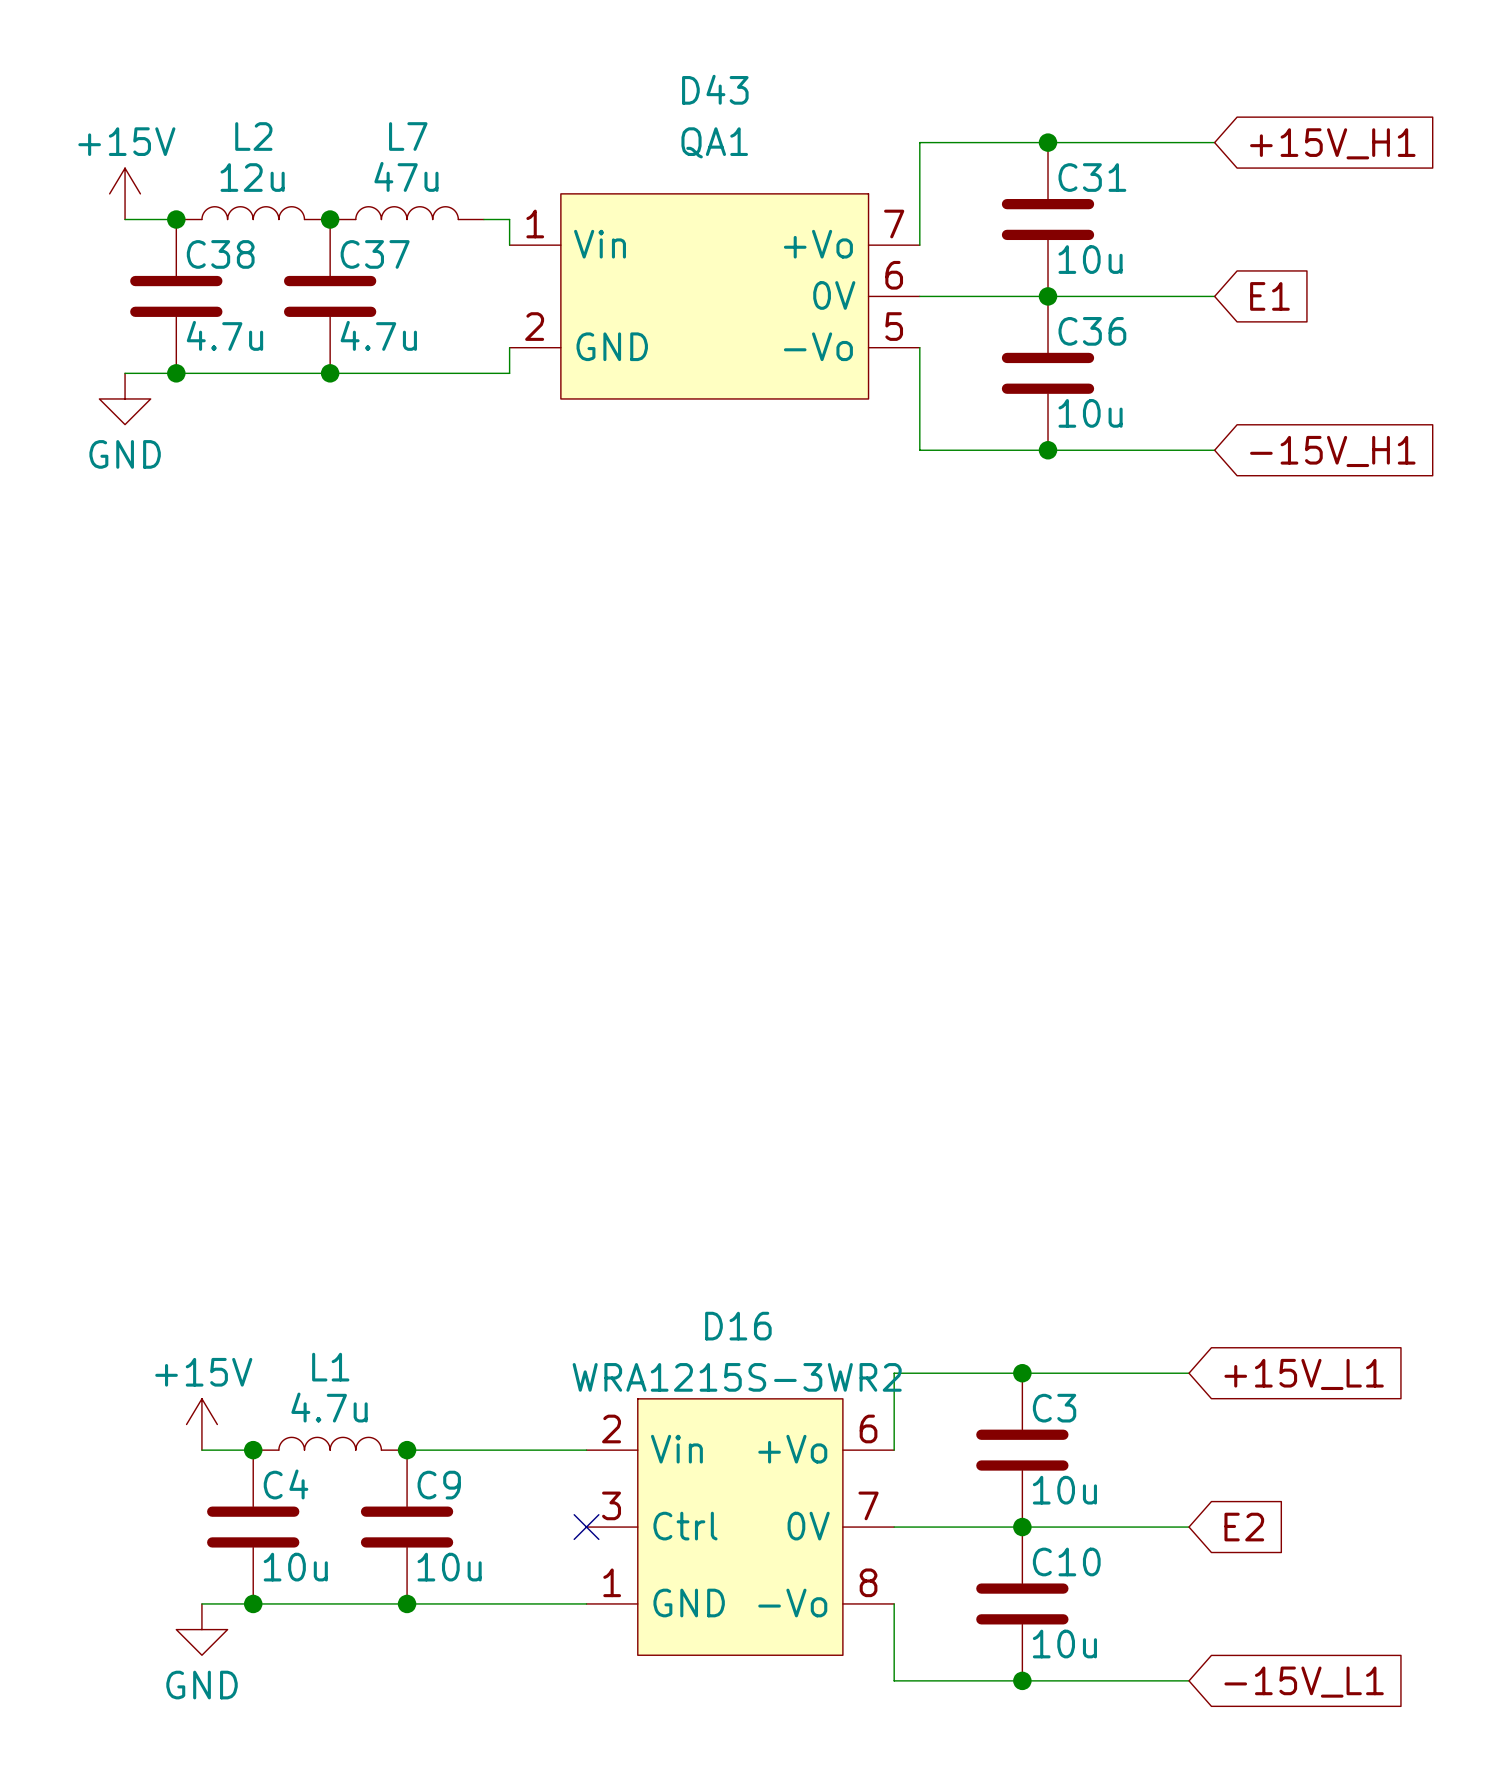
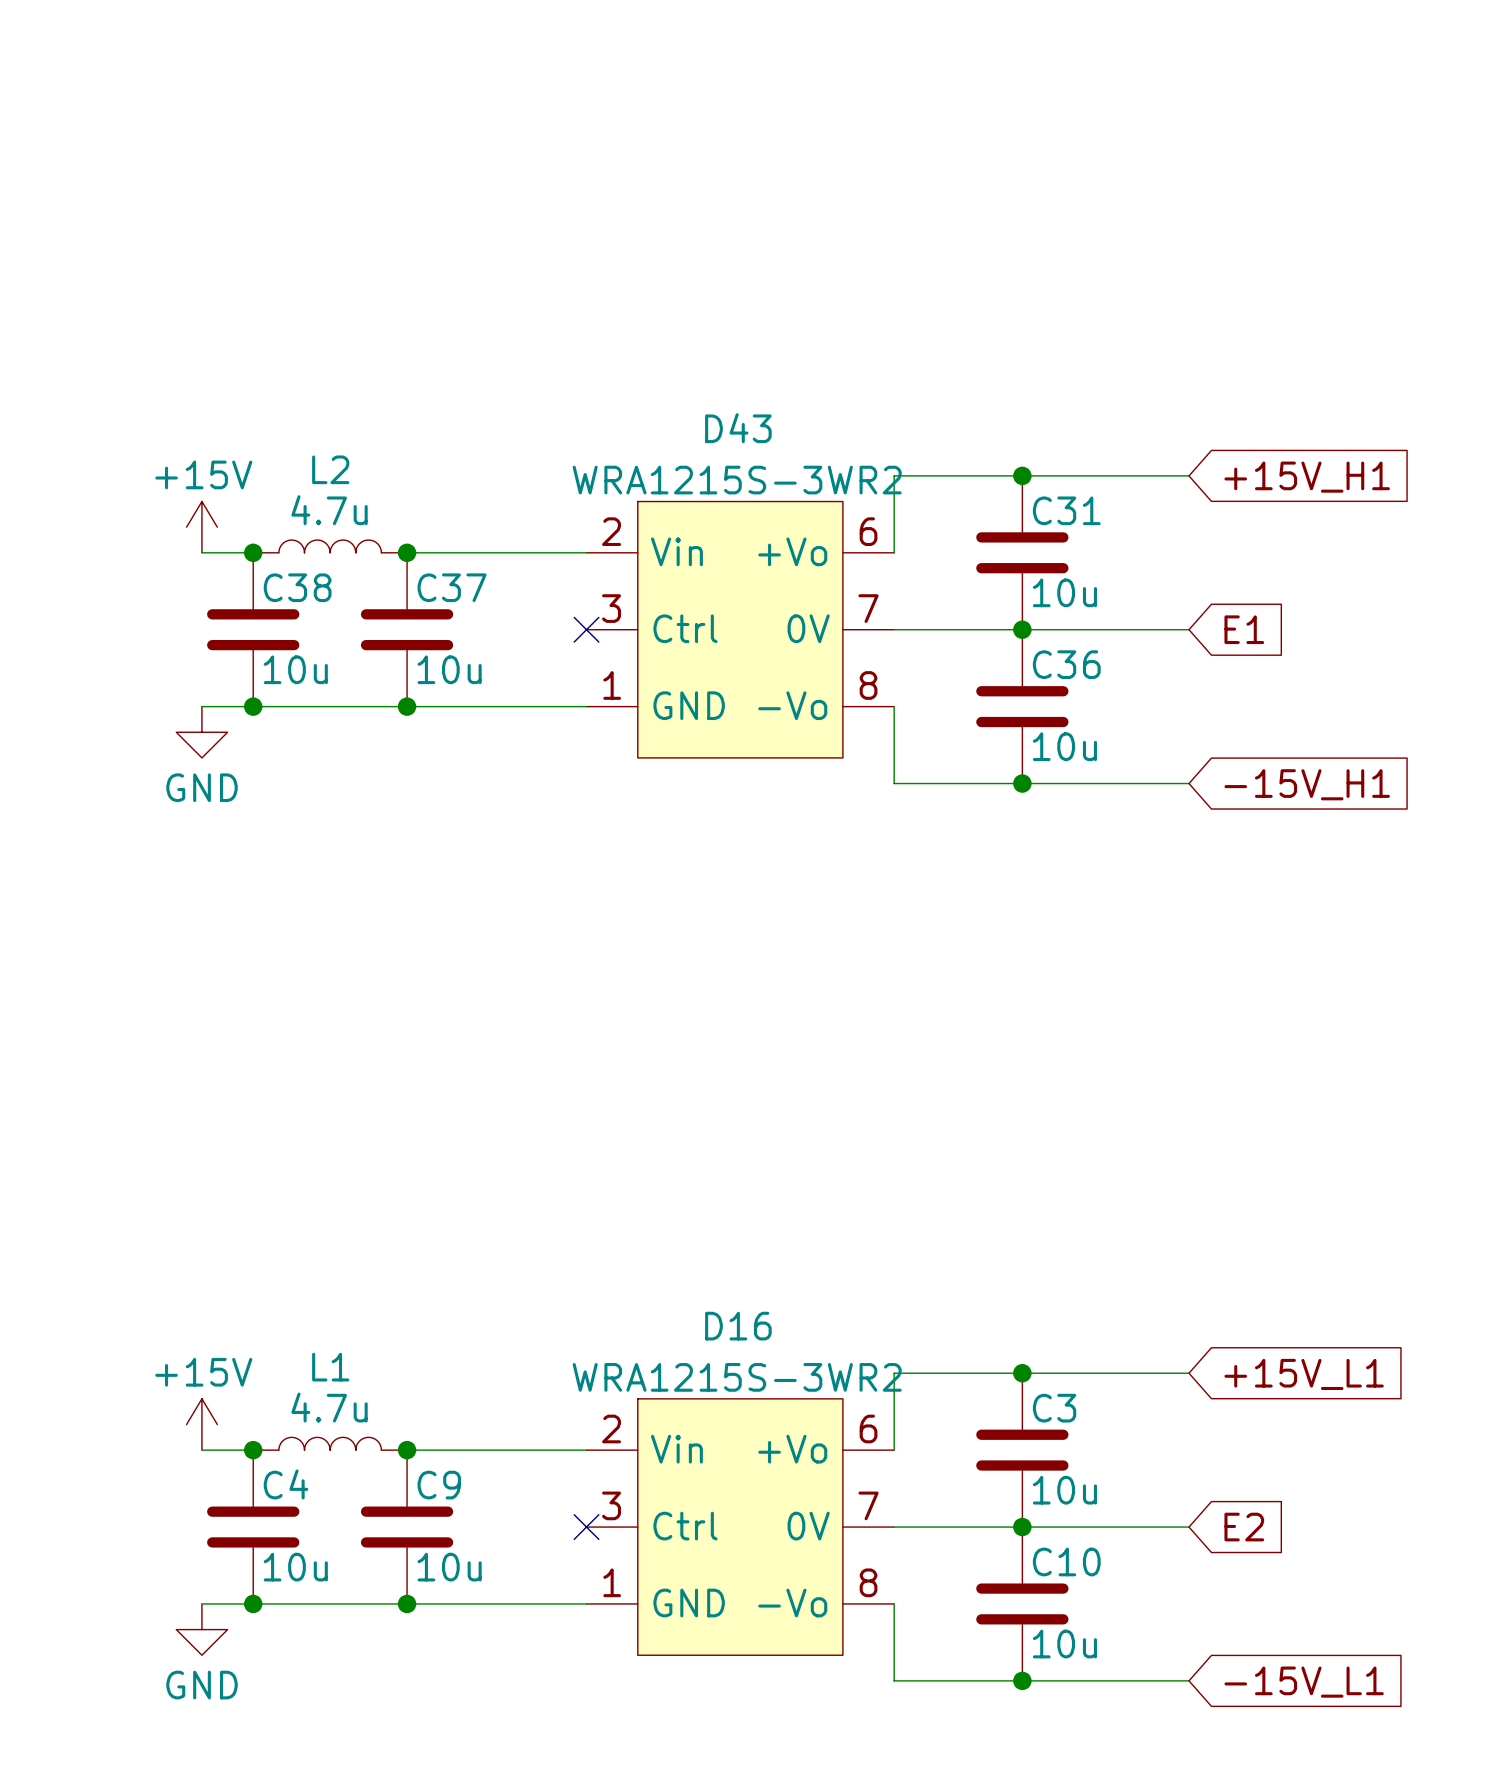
D43 value: QA1 (714, 142) -> WRA1215S-3WR2 (737, 480)
junction: (1048, 142) -> none
wire: (1214, 142) (919, 142) (919, 245) -> none
global label position: +15V_H1 (1332, 143) -> +15V_H1 (1307, 477)
L2 value: 12u (252, 177) -> 4.7u (329, 510)
power symbol position: +15V (125, 193) -> +15V (201, 527)
D43 symbol: [509, 193, 920, 400] -> [586, 501, 895, 758]
L2 position: (253, 213) -> (330, 546)
L7: 47u (407, 213) -> none
wire: (125, 219) (176, 219) -> (201, 552) (253, 552)
junction: (176, 219) -> none
junction: (330, 219) -> none
wire: (483, 219) (509, 219) (509, 245) -> none
C31 position: (1048, 219) -> (1022, 552)
C38 position: (176, 296) -> (253, 629)
C37 position: (330, 296) -> (407, 629)
wire: (919, 296) (1214, 296) -> (894, 629) (1189, 629)
junction: (1048, 296) -> none
global label position: E1 (1269, 296) -> E1 (1244, 629)
C38 value: 4.7u (224, 335) -> 10u (295, 669)
C37 value: 4.7u (378, 335) -> 10u (449, 669)
wire: (509, 347) (509, 373) (125, 373) -> none
wire: (919, 347) (919, 450) (1214, 450) -> none
junction: (176, 373) -> none
junction: (330, 373) -> none
C36 position: (1048, 373) -> (1022, 706)
power symbol position: GND (125, 398) -> GND (201, 732)
junction position: (1048, 450) -> (1022, 475)
global label position: -15V_H1 (1332, 451) -> -15V_H1 (1307, 784)
wire: none -> (1189, 475) (894, 475) (894, 552)
junction: none -> (253, 552)
wire: none -> (407, 552) (586, 552)
junction: none -> (407, 552)
no-connect mark: none -> (586, 629)
junction: none -> (1022, 629)
wire: none -> (201, 706) (586, 706)
junction: none -> (253, 706)
junction: none -> (407, 706)
wire: none -> (894, 706) (894, 783) (1189, 783)
junction: none -> (1022, 783)

